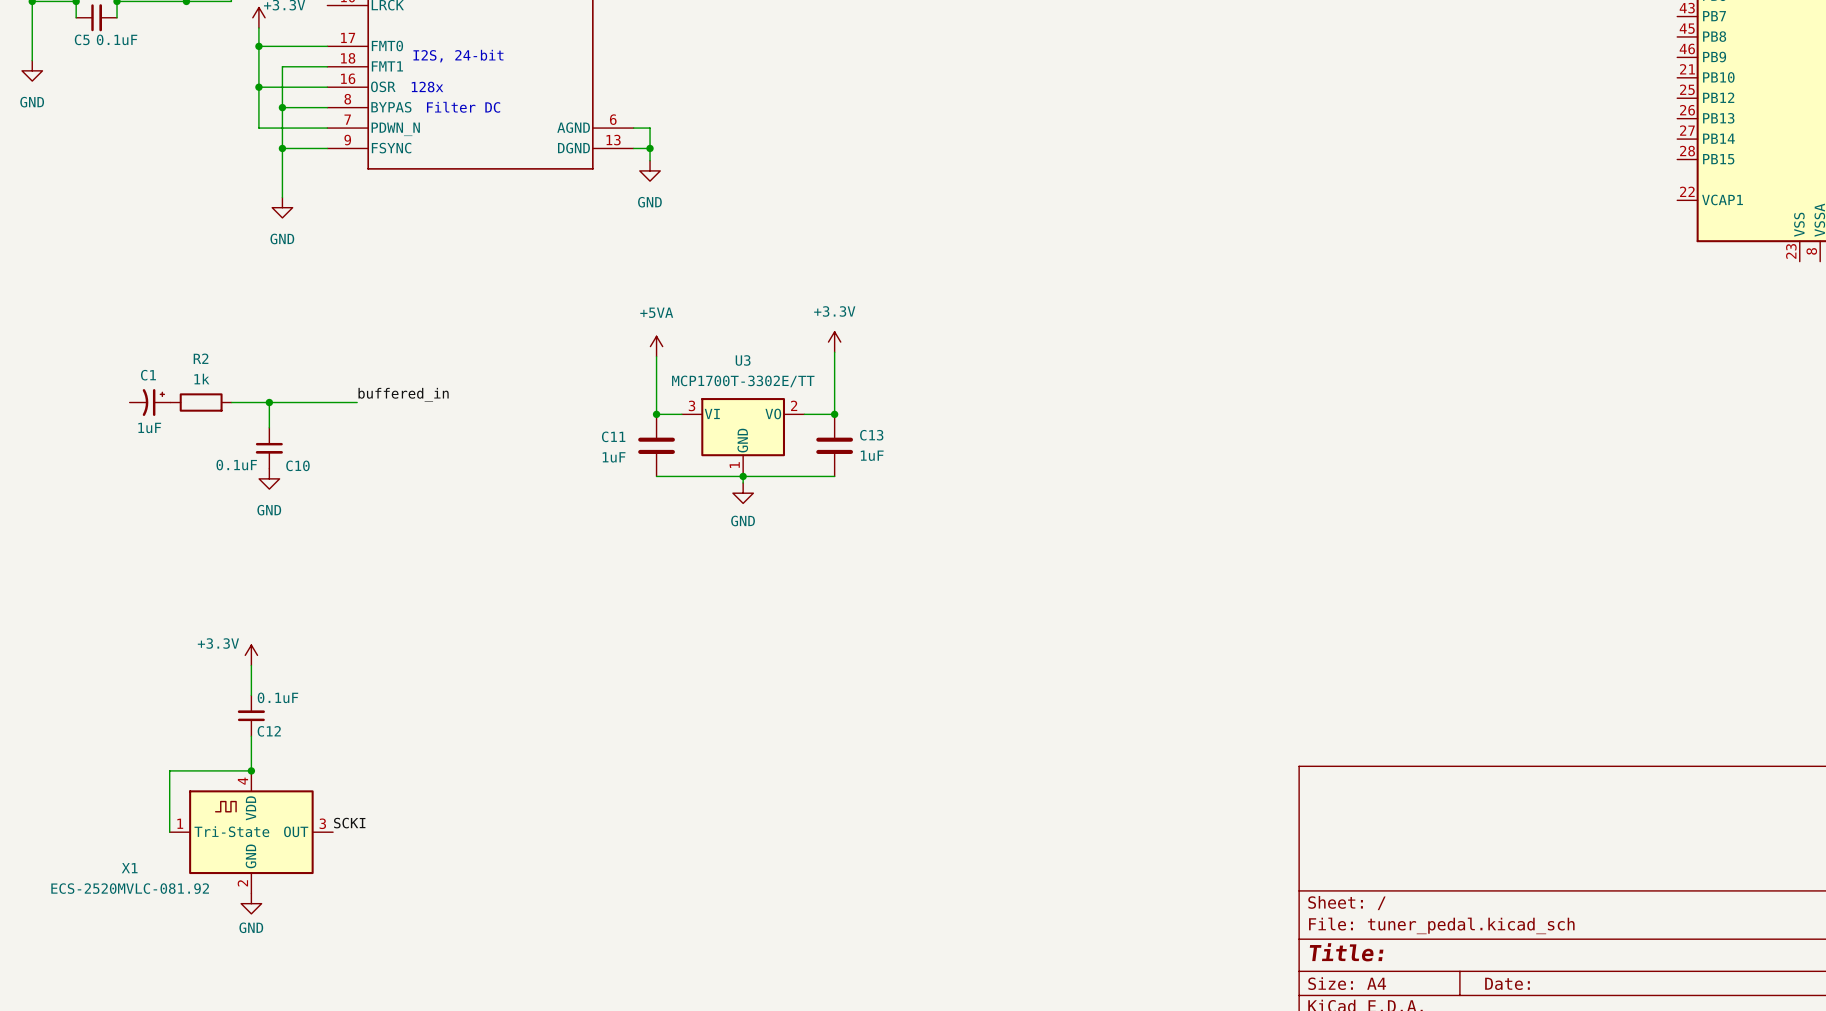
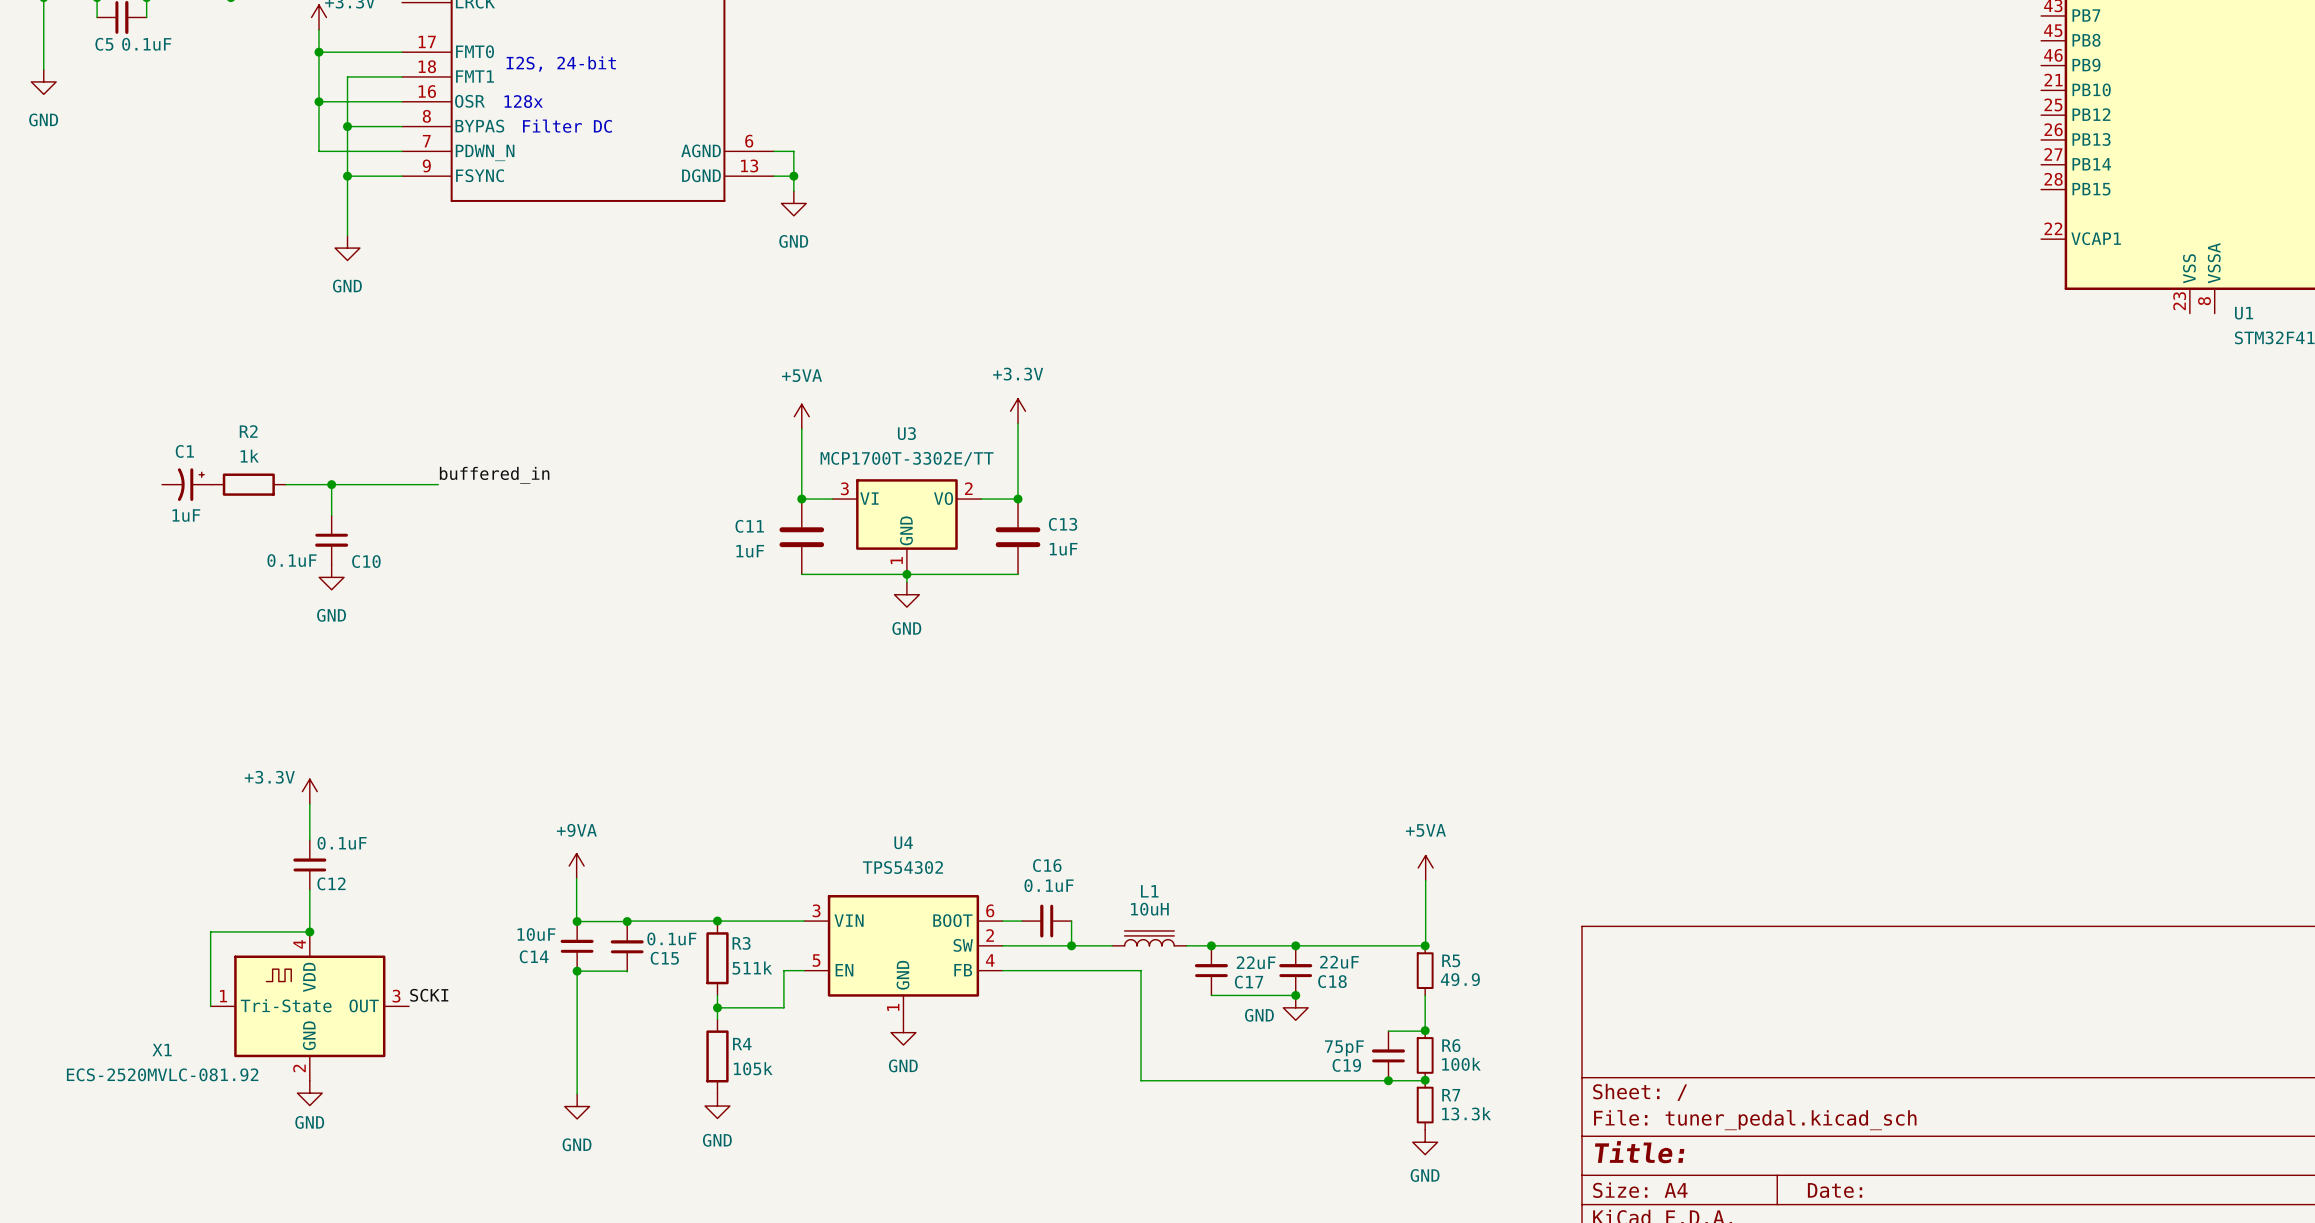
power symbol: none -> +9VA (576, 866)
power symbol: none -> +5VA (1425, 867)
wire: none -> (576, 878) (576, 921) (627, 921)
wire: none -> (1425, 880) (1425, 945) (1186, 945)
junction: none -> (717, 921)
wire: none -> (804, 921) (627, 922)
wire: none -> (1002, 921) (1021, 921)
C16: none -> 0.1uF (1046, 921)
wire: none -> (1071, 921) (1071, 945)
junction: none -> (577, 921)
junction: none -> (627, 921)
L1: none -> 10uH (1149, 938)
C14: none -> 10uF (577, 946)
wire: none -> (1002, 945) (1112, 945)
junction: none -> (1071, 945)
junction: none -> (1211, 945)
junction: none -> (1295, 945)
junction: none -> (1425, 945)
C15: none -> 0.1uF (627, 946)
R3: none -> 511k (717, 958)
U4: none -> TPS54302 (903, 957)
wire: none -> (804, 970) (783, 970) (783, 1007) (717, 1007)
wire: none -> (1002, 970) (1141, 970) (1141, 1080) (1425, 1080)
C17: none -> 22uF (1211, 970)
C18: none -> 22uF (1295, 970)
R5: none -> 49.9 (1425, 970)
junction: none -> (577, 971)
wire: none -> (627, 971) (577, 971) (577, 1094)
wire: none -> (717, 995) (717, 1019)
wire: none -> (1211, 995) (1295, 995)
junction: none -> (1295, 995)
wire: none -> (1425, 995) (1425, 1031) (1388, 1031)
junction: none -> (717, 1007)
power symbol: none -> GND (1295, 1007)
junction: none -> (1425, 1030)
power symbol: none -> GND (903, 1032)
R6: none -> 100k (1425, 1055)
R4: none -> 105k (717, 1056)
C19: none -> 75pF (1388, 1055)
junction: none -> (1388, 1080)
junction: none -> (1425, 1080)
R7: none -> 13.3k (1425, 1105)
power symbol: none -> GND (577, 1106)
power symbol: none -> GND (717, 1106)
power symbol: none -> GND (1425, 1142)

